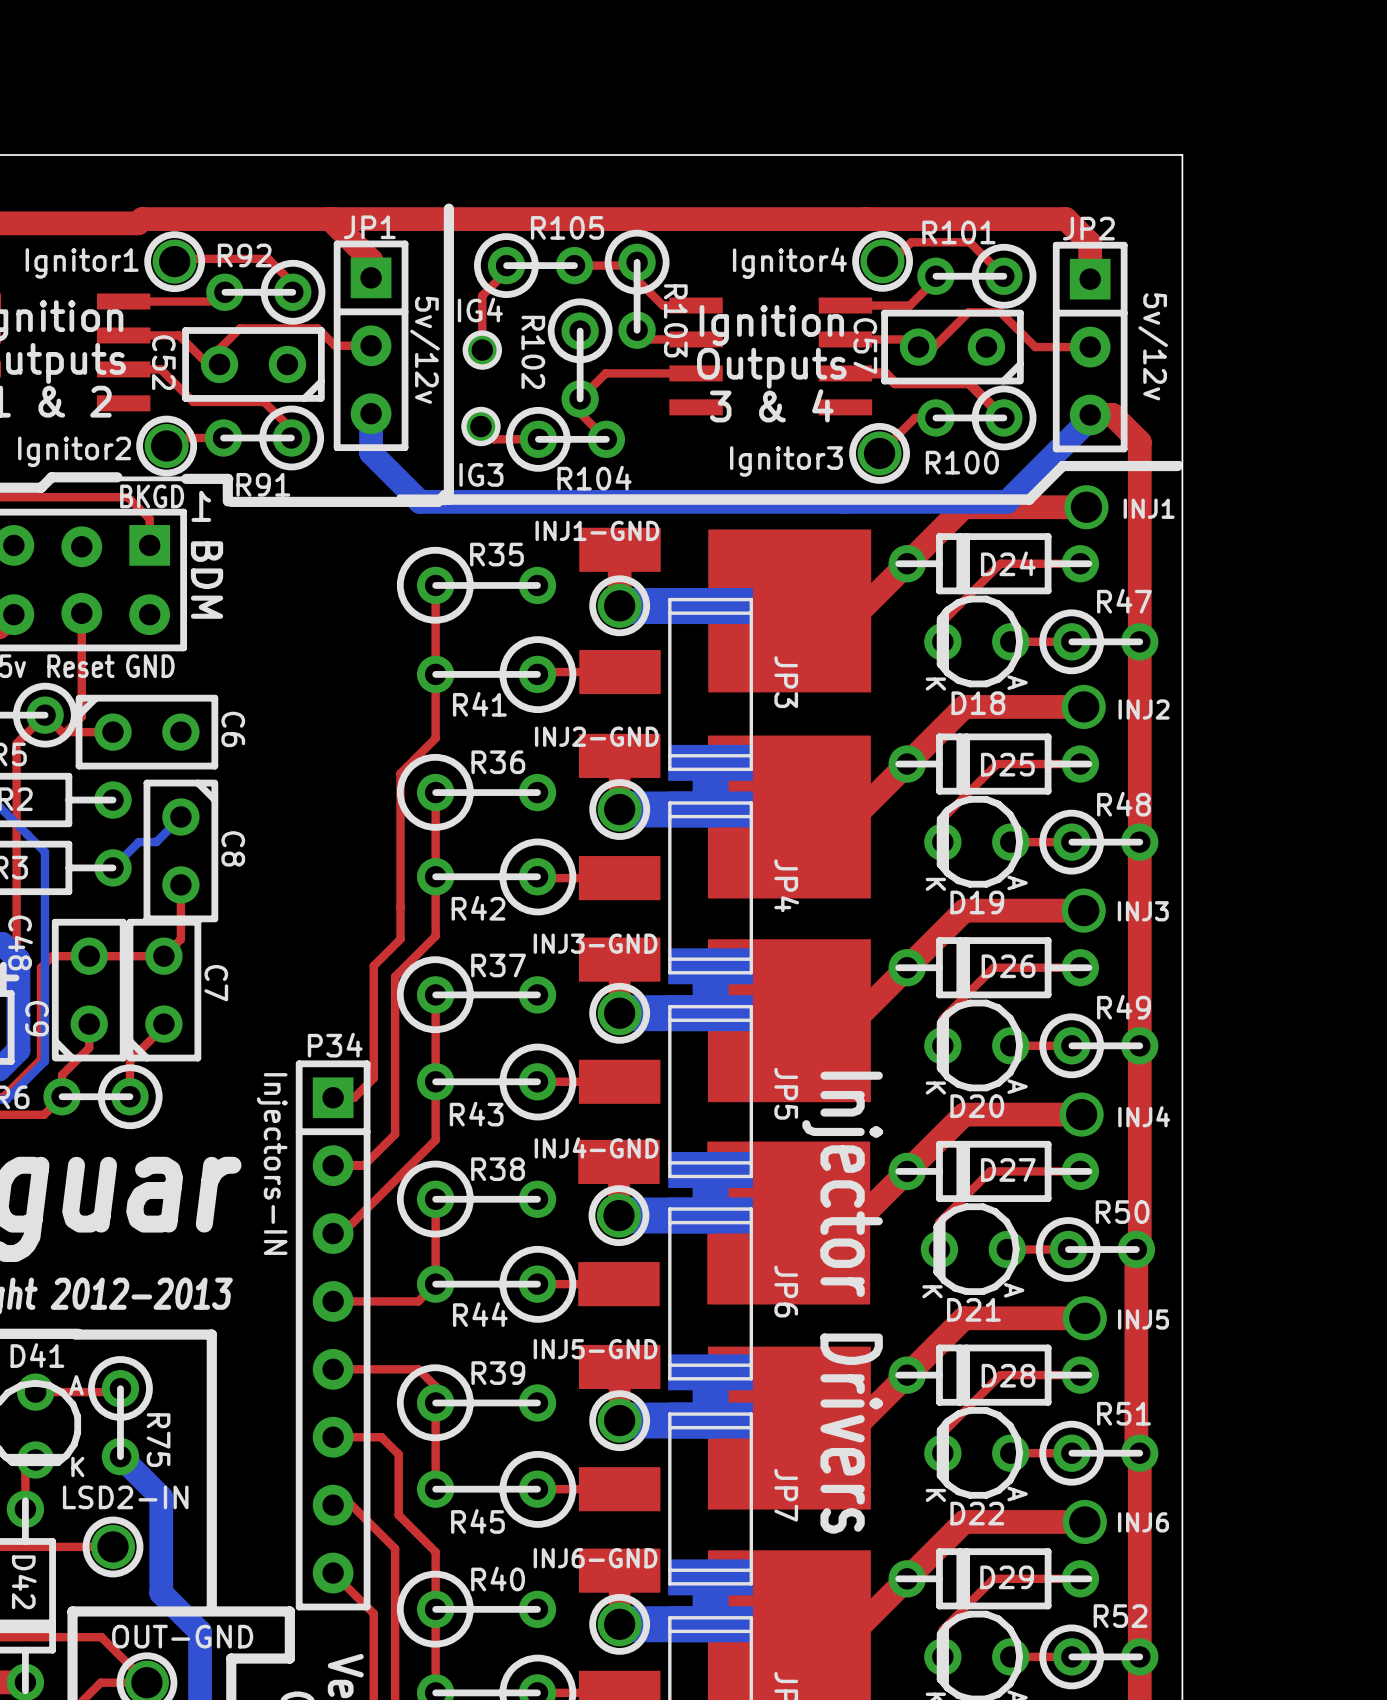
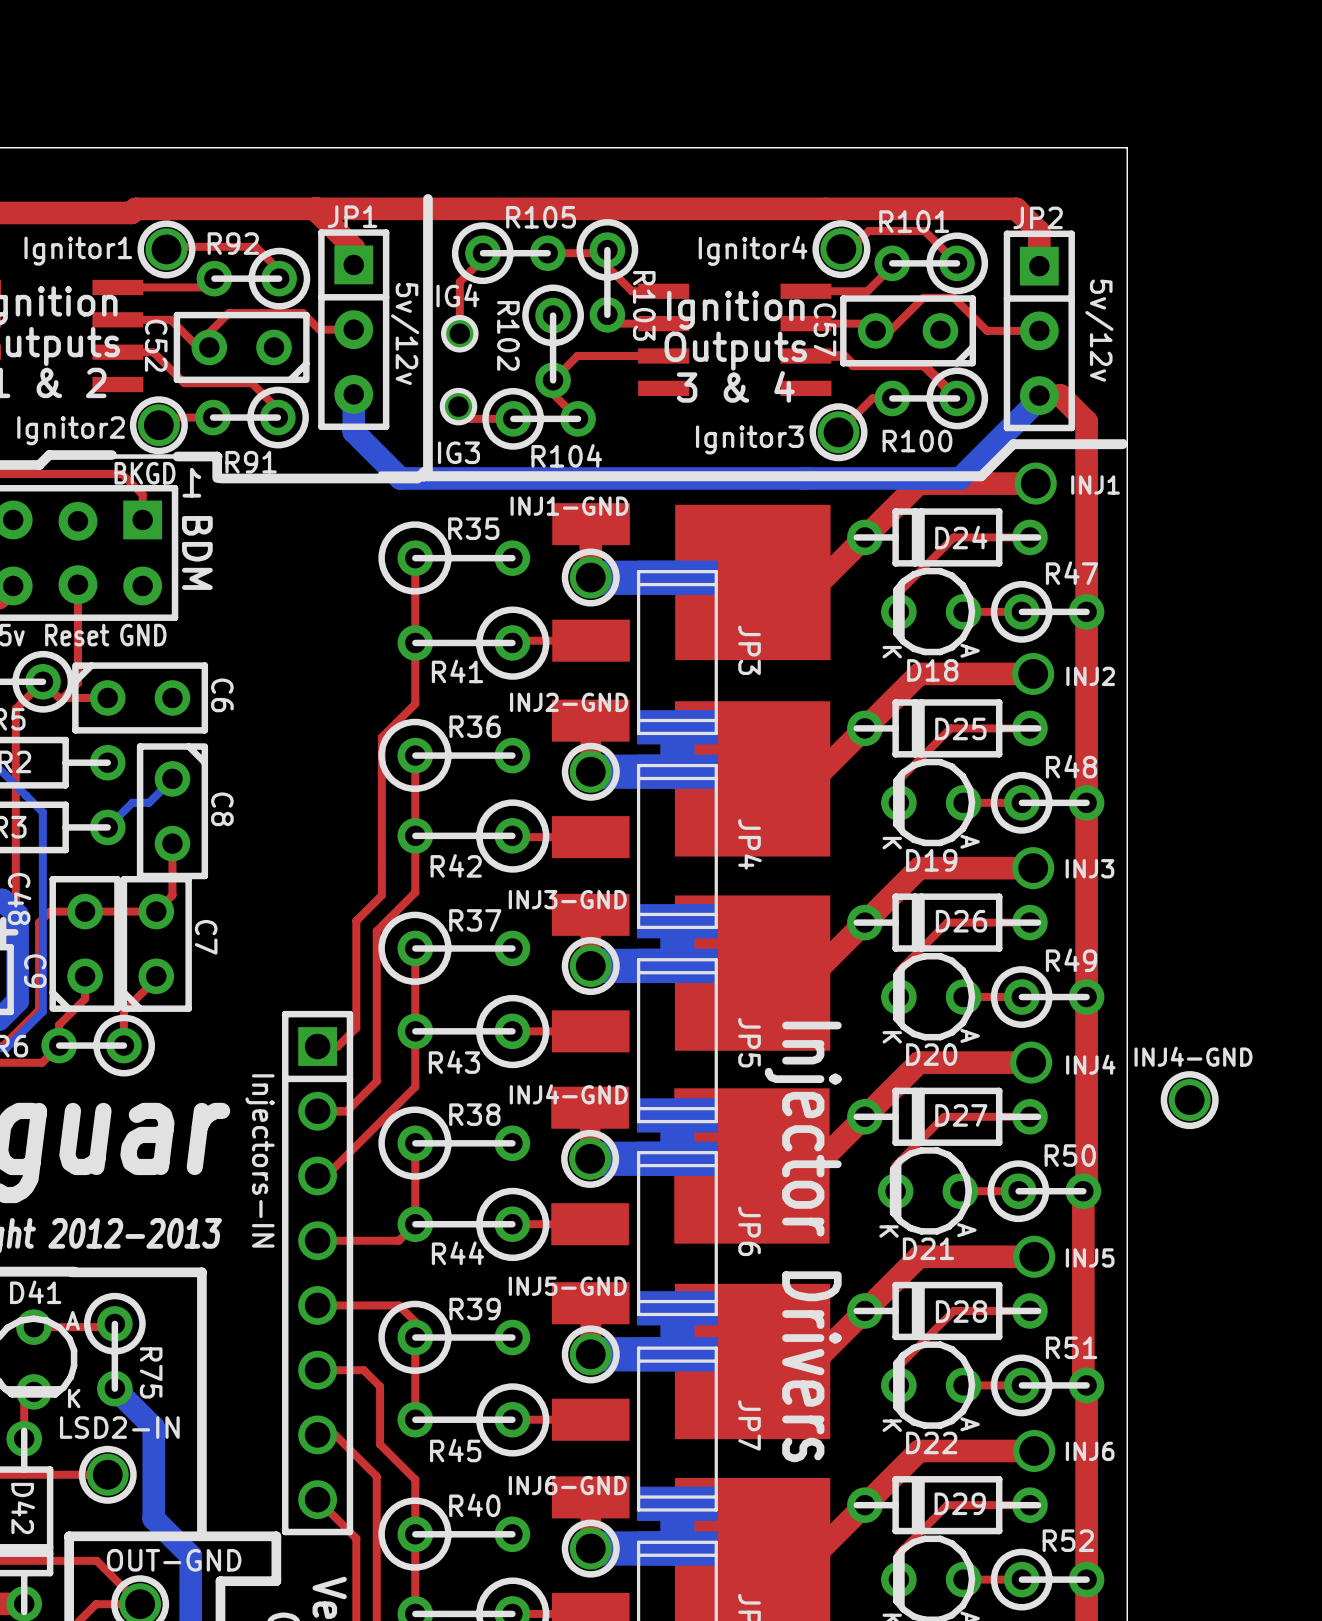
part: none -> INJ4-GND (1189, 1100)
P34: Injectors-IN (333, 1335) -> none
part: none -> Injectors-IN (317, 1273)

